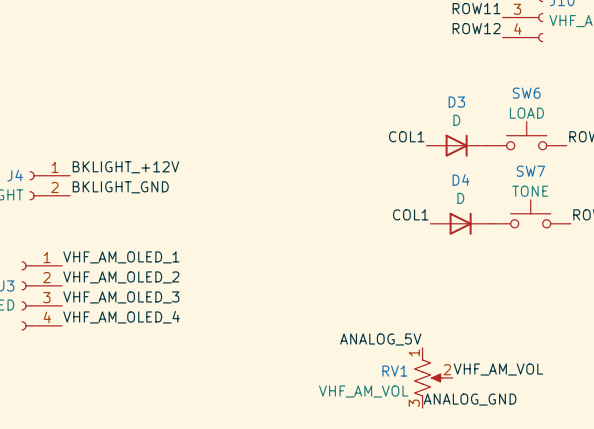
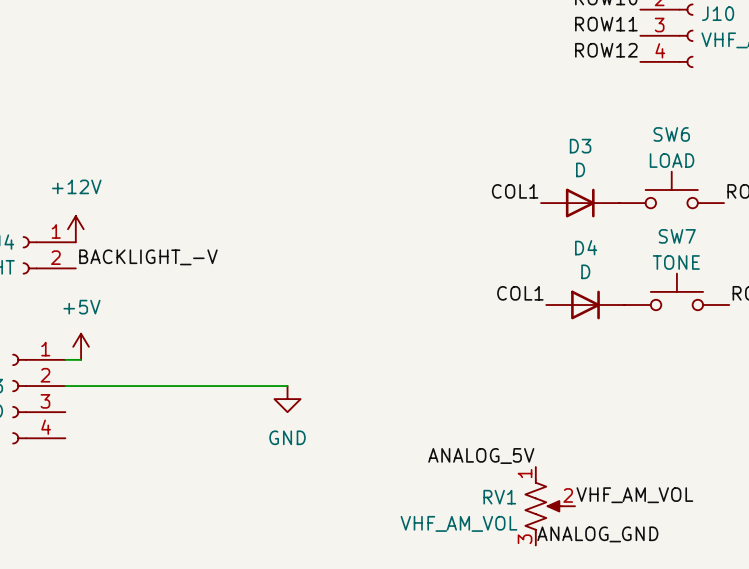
power symbol: none -> +12V (75, 229)
label: BKLIGHT_+12V (125, 167) -> none
label: BKLIGHT_GND (120, 187) -> BACKLIGHT_-V (148, 257)
power symbol: none -> +5V (81, 346)
label: VHF_AM_OLED_1 (121, 257) -> none
wire: none -> (65, 359) (81, 359)
label: VHF_AM_OLED_2 (121, 277) -> none
wire: none -> (65, 386) (287, 386)
power symbol: none -> GND (287, 399)
label: VHF_AM_OLED_3 (121, 297) -> none
label: VHF_AM_OLED_4 (121, 317) -> none

